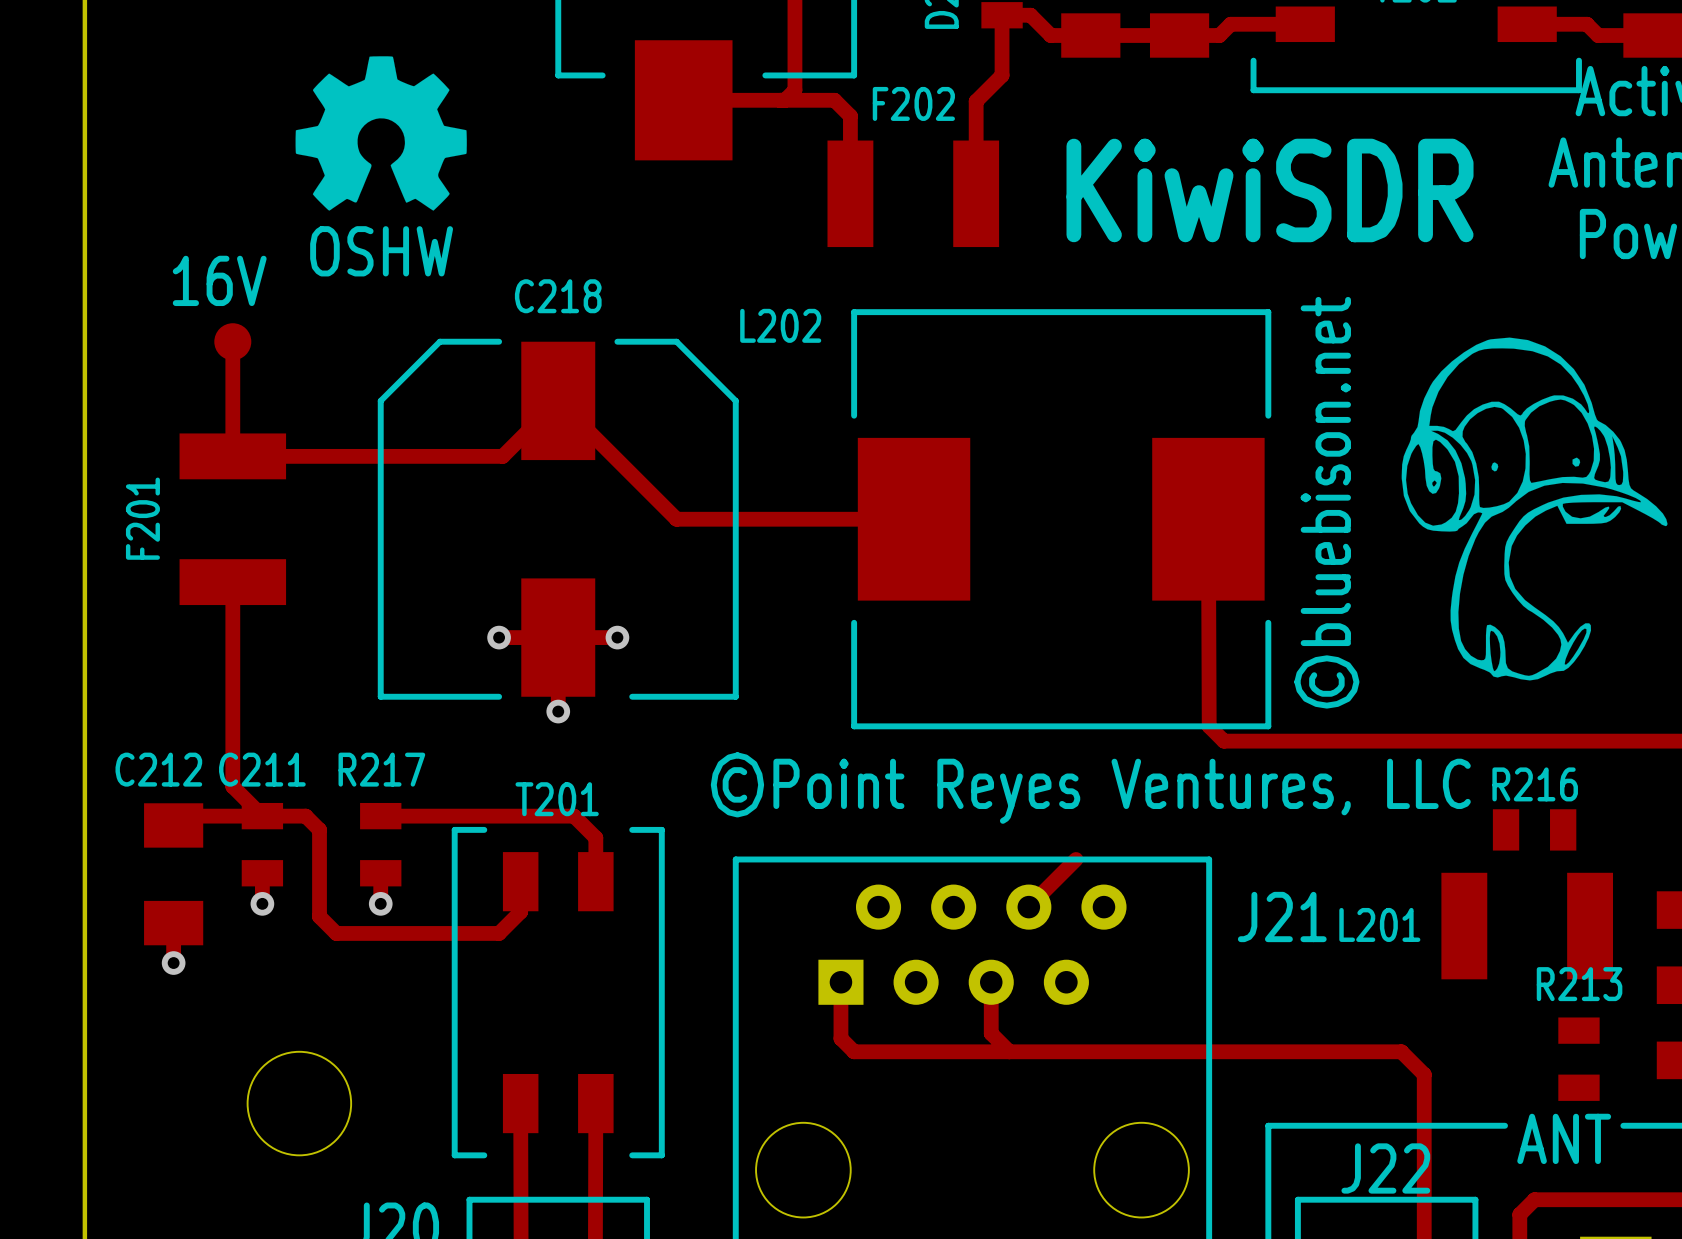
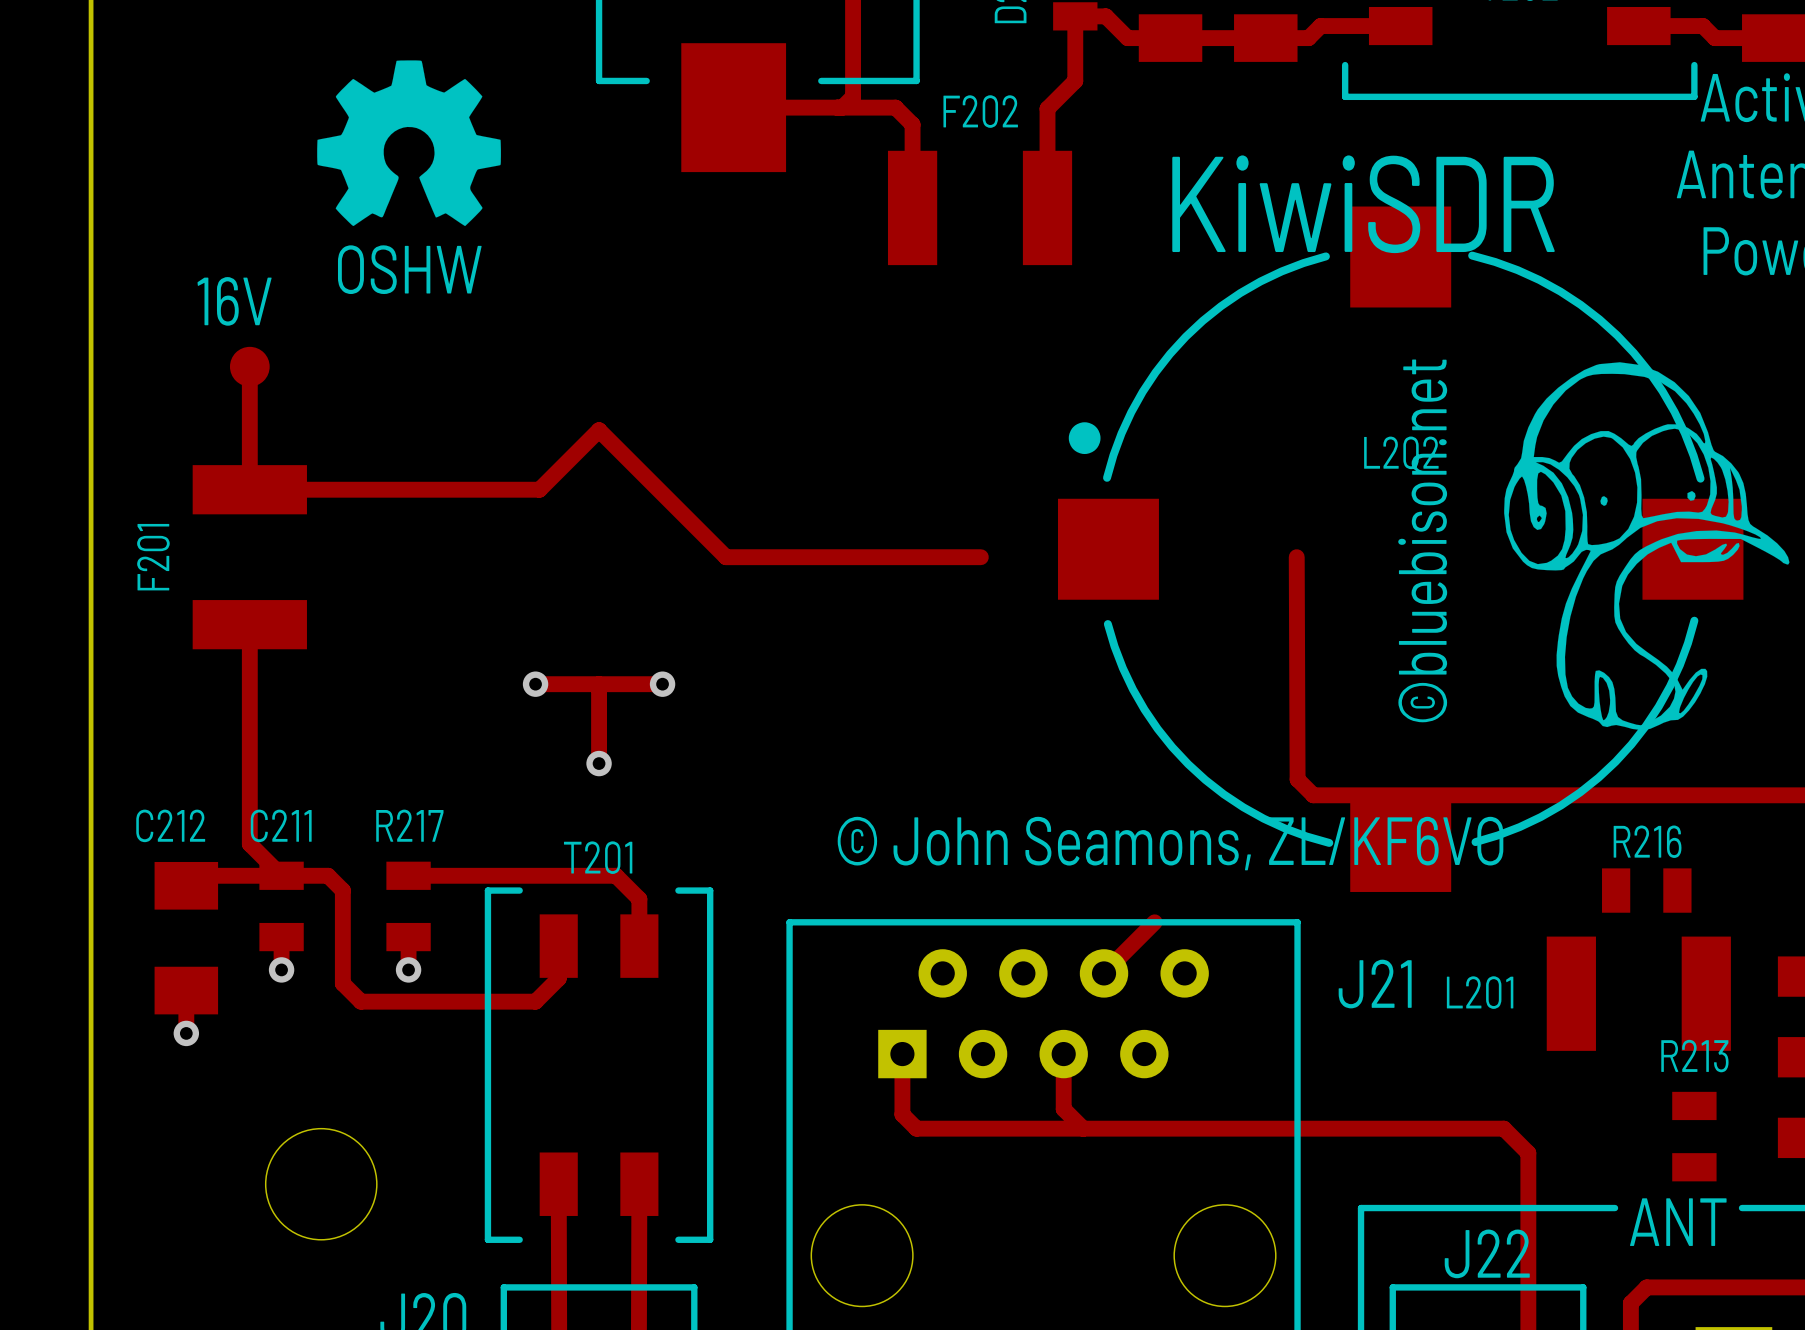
L202 footprint: [851, 309, 1272, 730] -> [1057, 206, 1744, 892]
L202 name position: L202 (780, 325) -> L202 (1401, 452)
C218: (558, 519) -> none
text: ©Point Reyes Ventures, LLC (1090, 788) -> © John Seamons, ZL/KF6VO (1170, 843)

